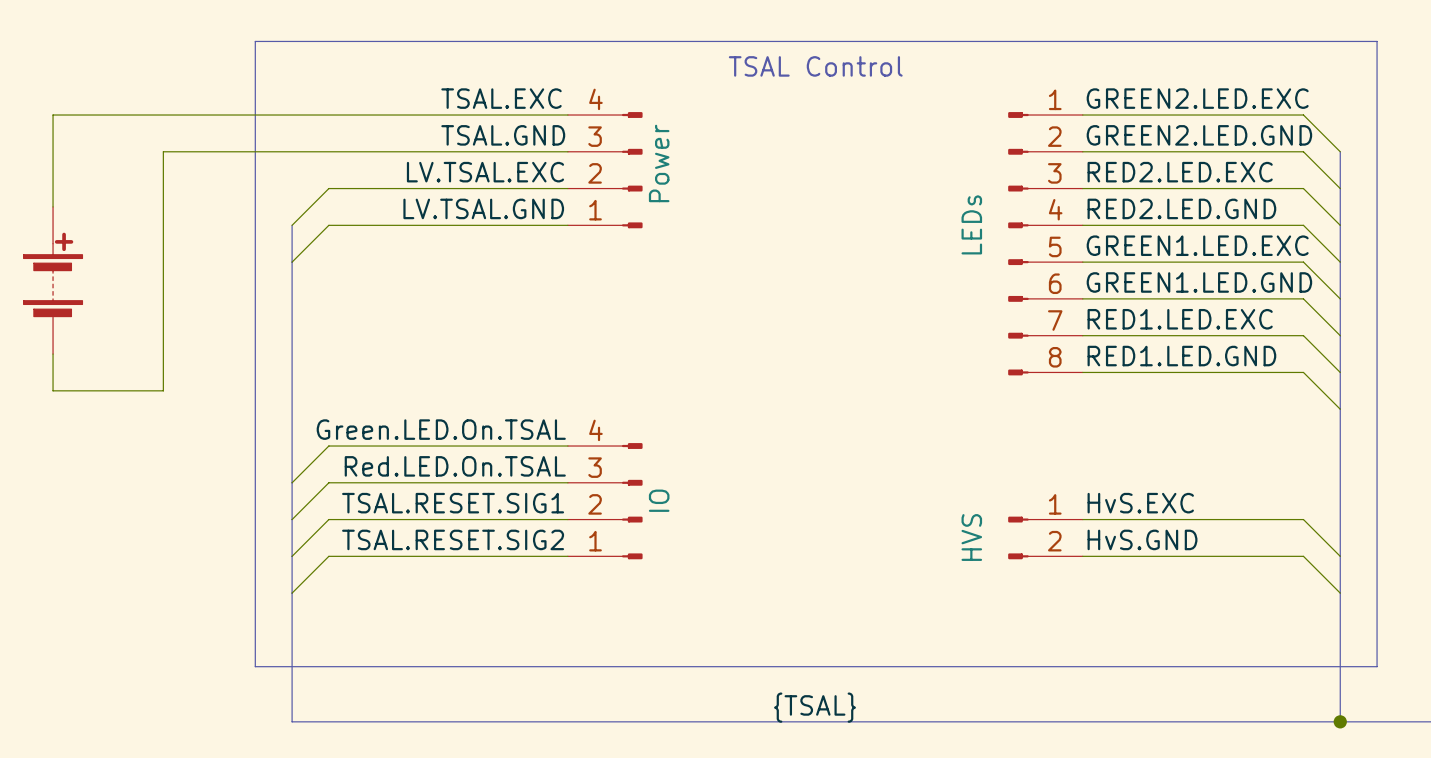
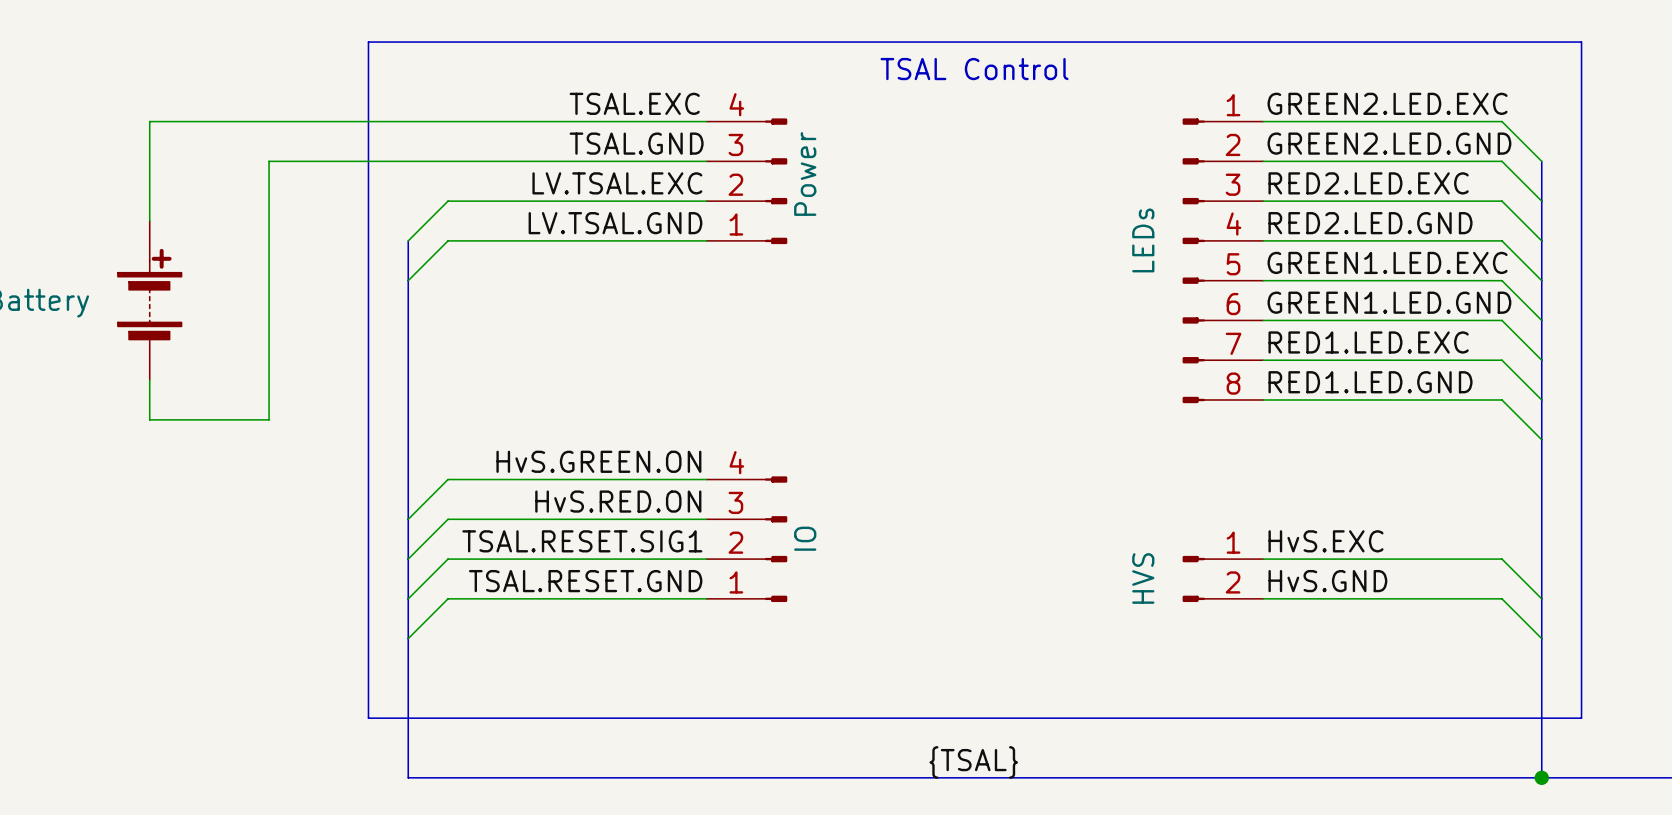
label: Green.LED.On.TSAL (441, 429) -> HvS.GREEN.ON (598, 461)
label: Red.LED.On.TSAL (455, 466) -> HvS.RED.ON (618, 501)
label: TSAL.RESET.SIG2 (453, 539) -> TSAL.RESET.GND (585, 581)

